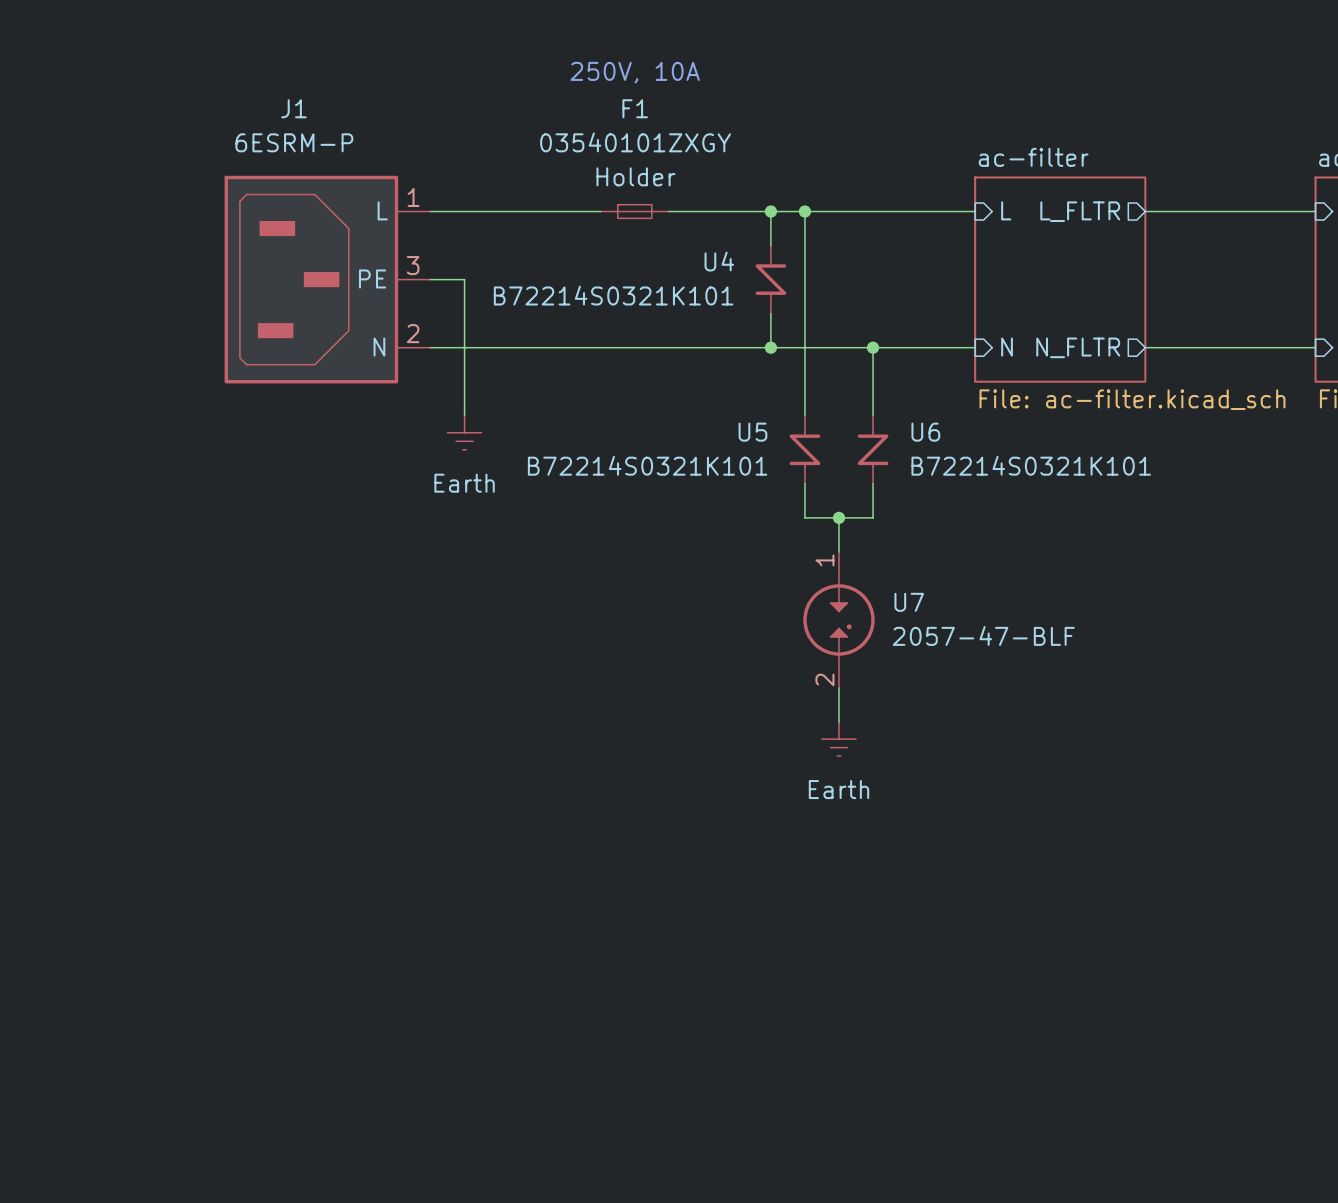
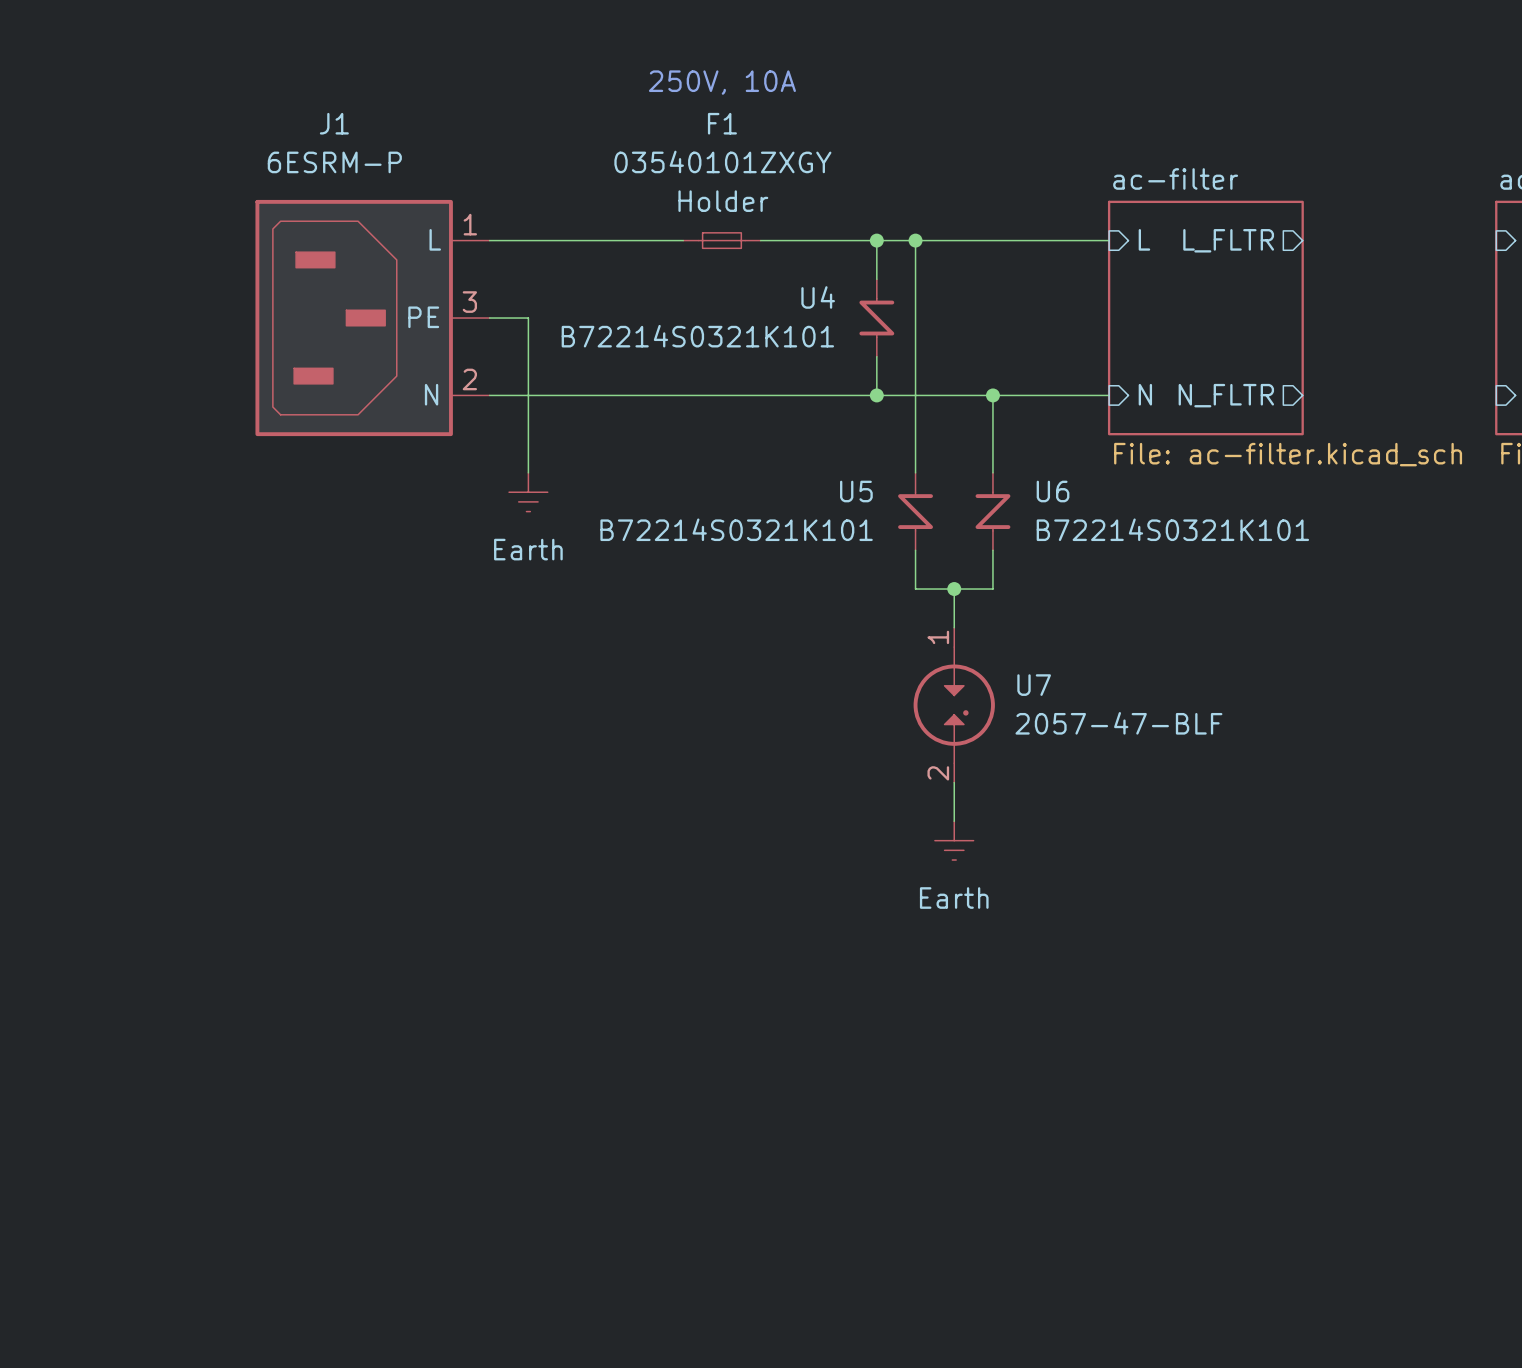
wire: (1145, 211) (1315, 211) -> none
wire: (1145, 347) (1315, 347) -> none

